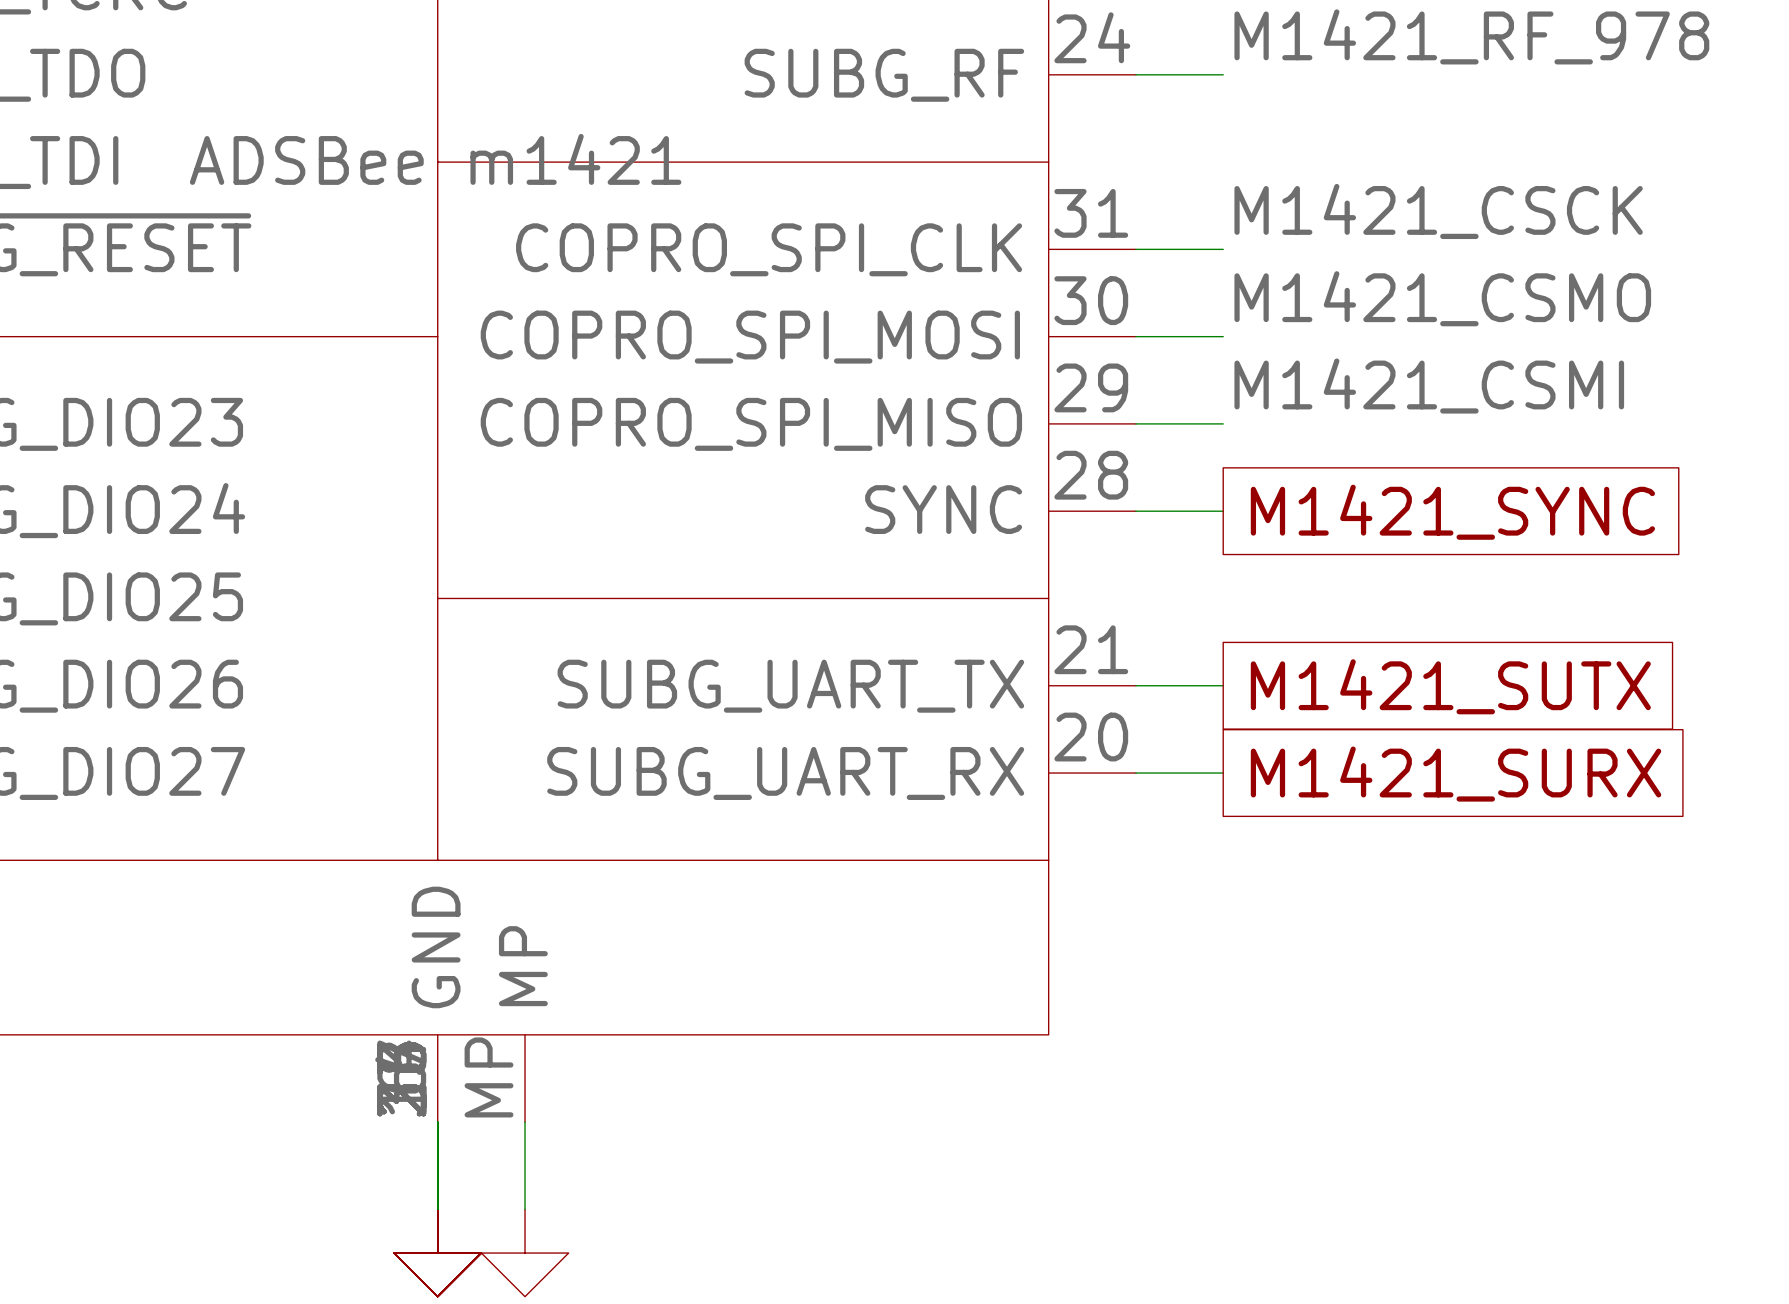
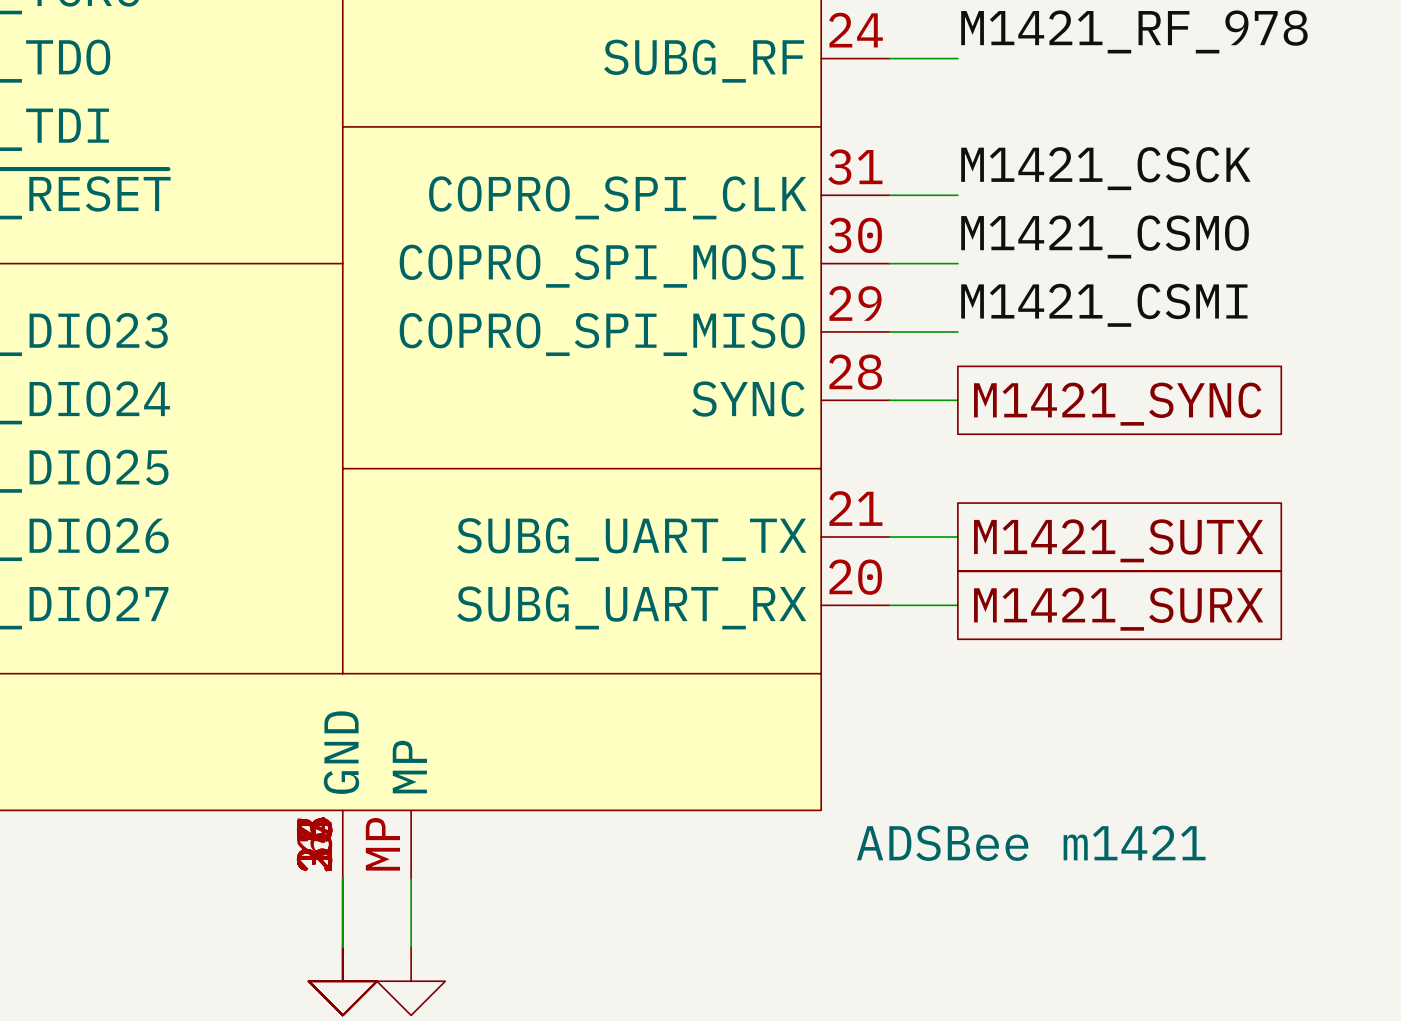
part value position: ADSBee m1421 (435, 159) -> ADSBee m1421 (1031, 843)

